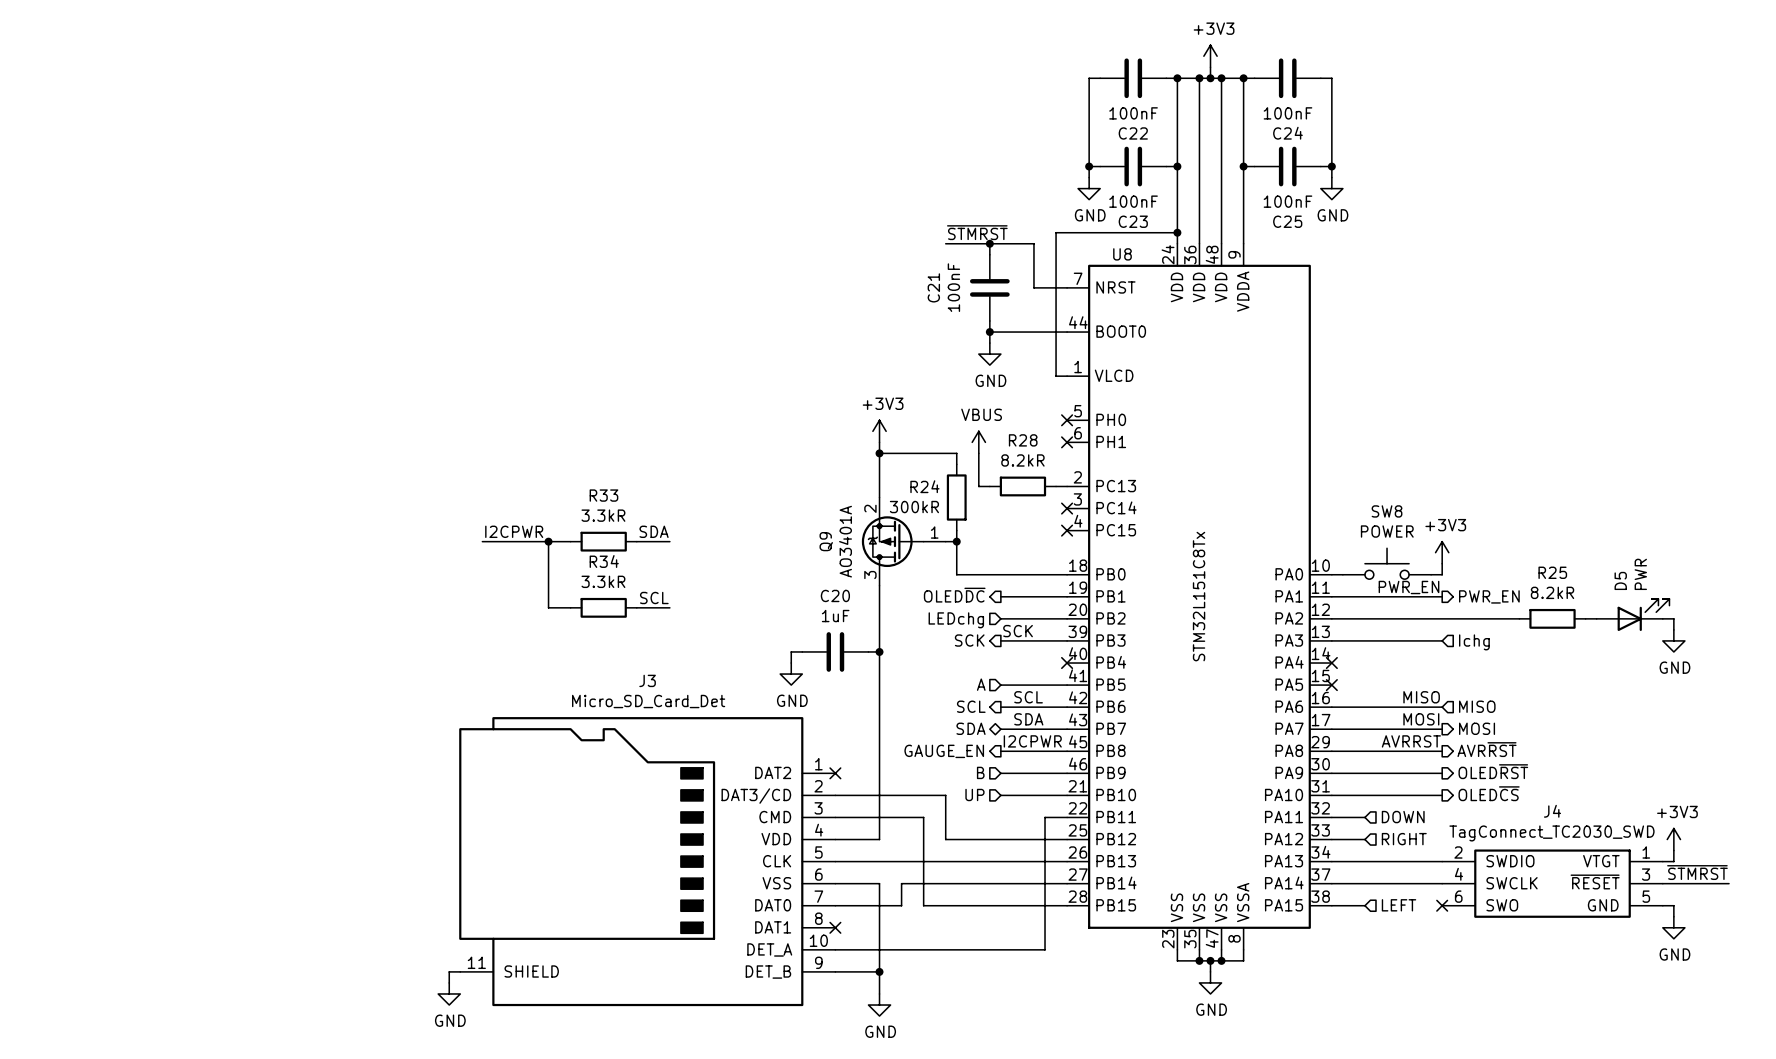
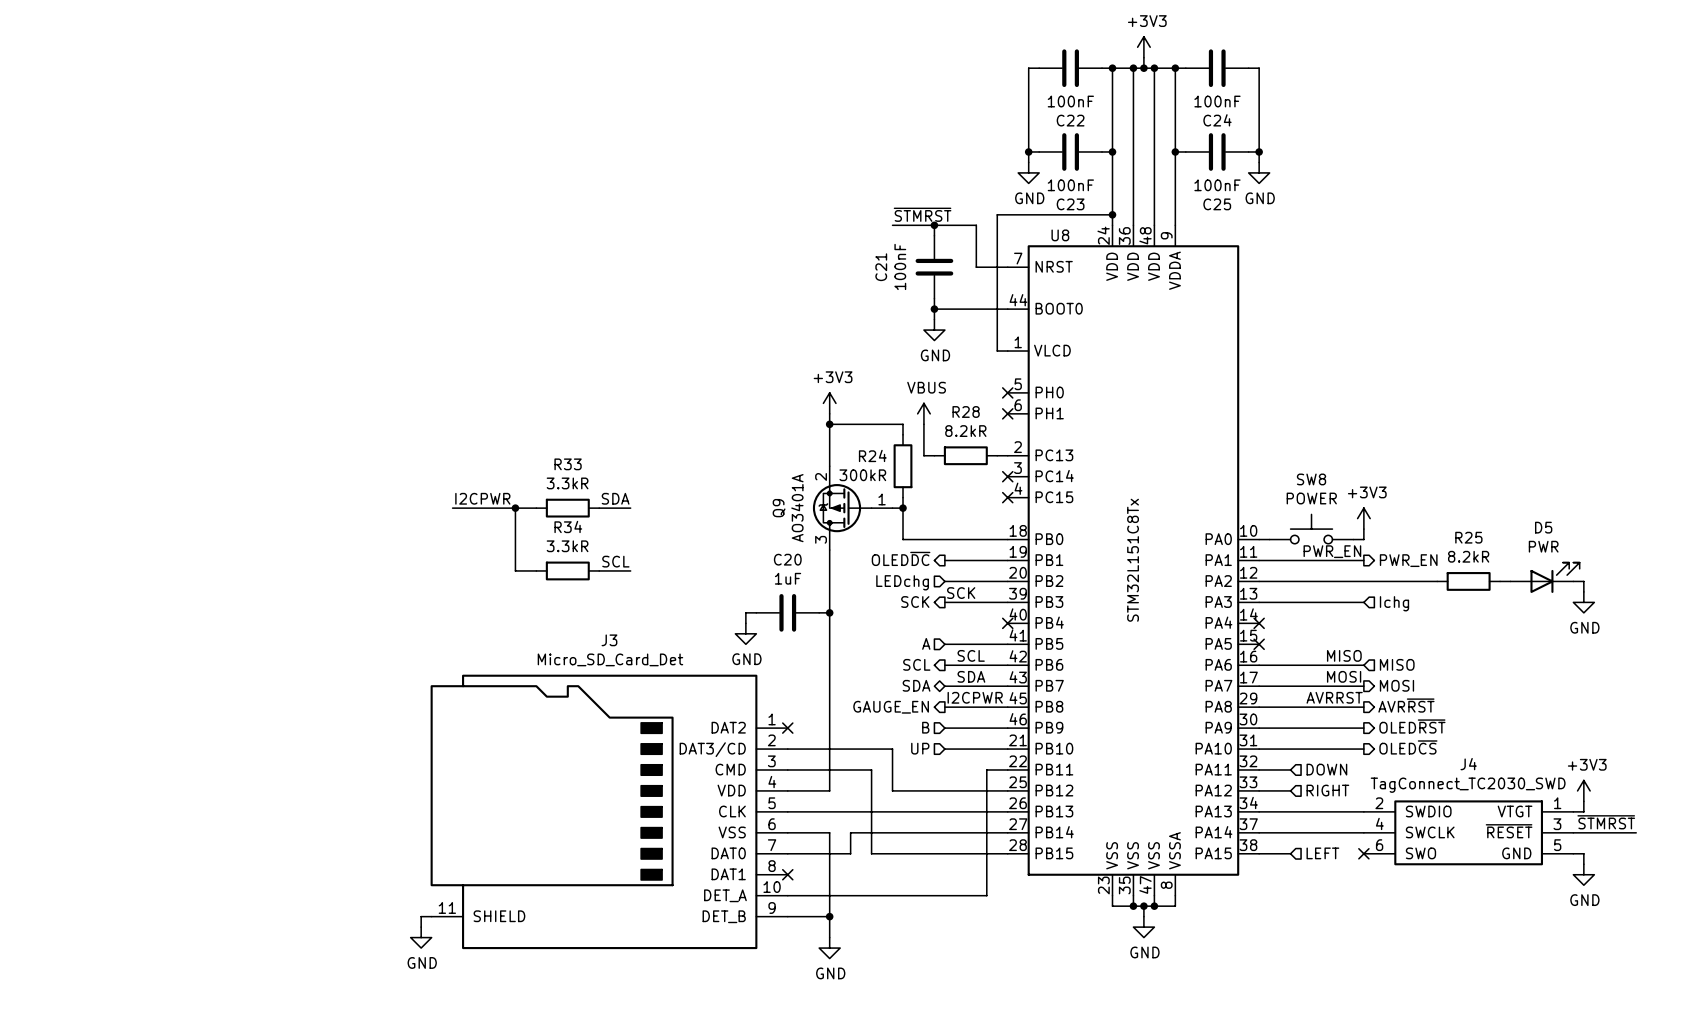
D5 value rotation: 0° (1640, 574) -> 90° clockwise (1543, 546)
D5 name rotation: 0° (1620, 580) -> 90° clockwise (1543, 527)

